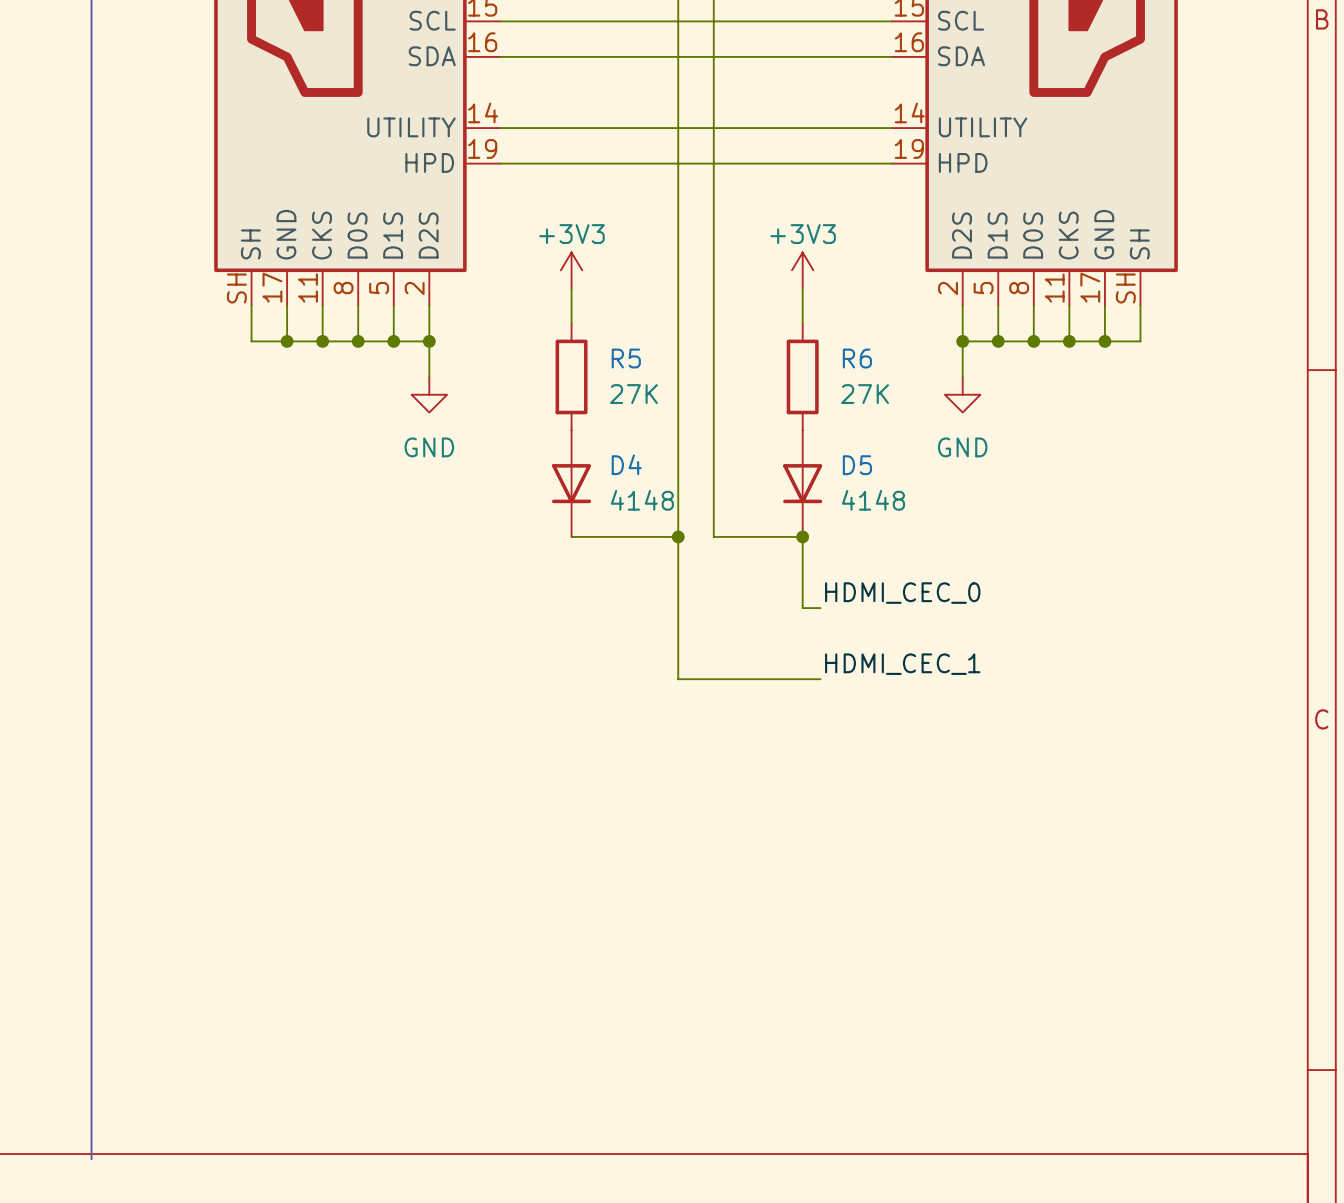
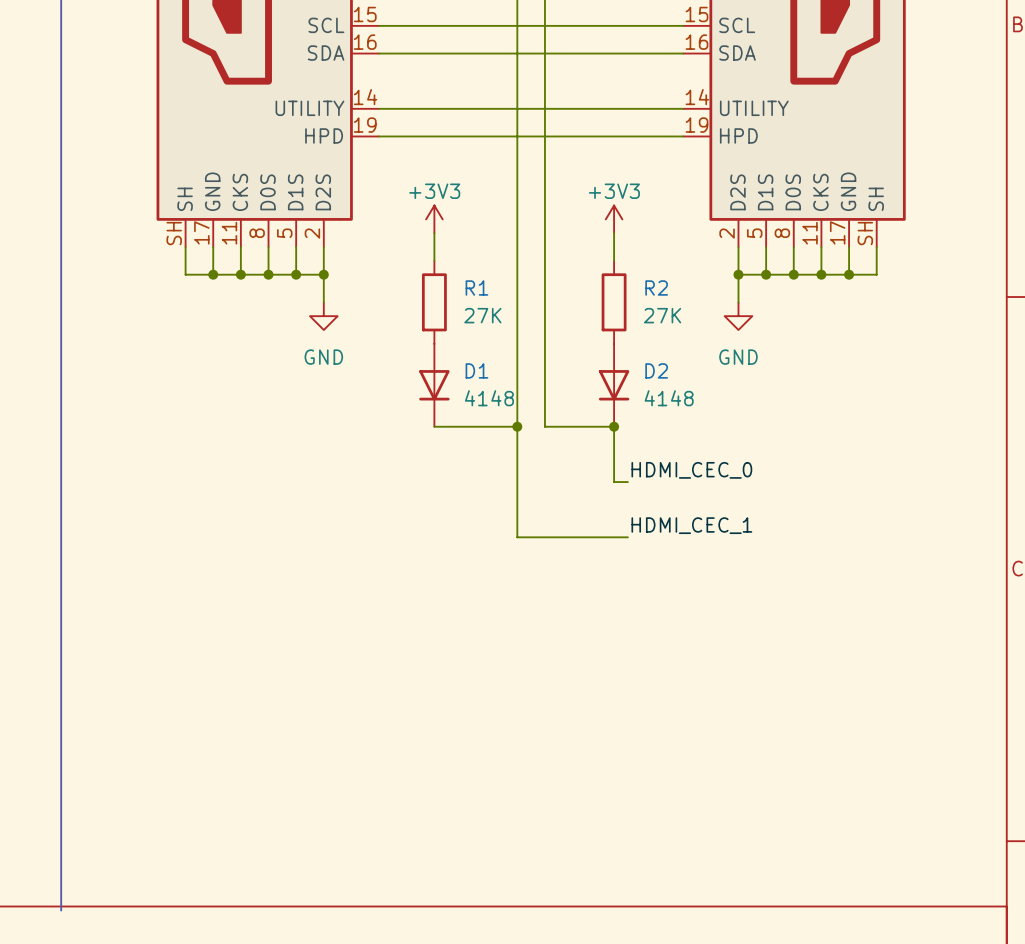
R5 name: R5 (626, 358) -> R1 (476, 288)
R6 name: R6 (857, 358) -> R2 (656, 288)
D4 name: D4 (626, 464) -> D1 (476, 370)
D5 name: D5 (857, 465) -> D2 (656, 370)

